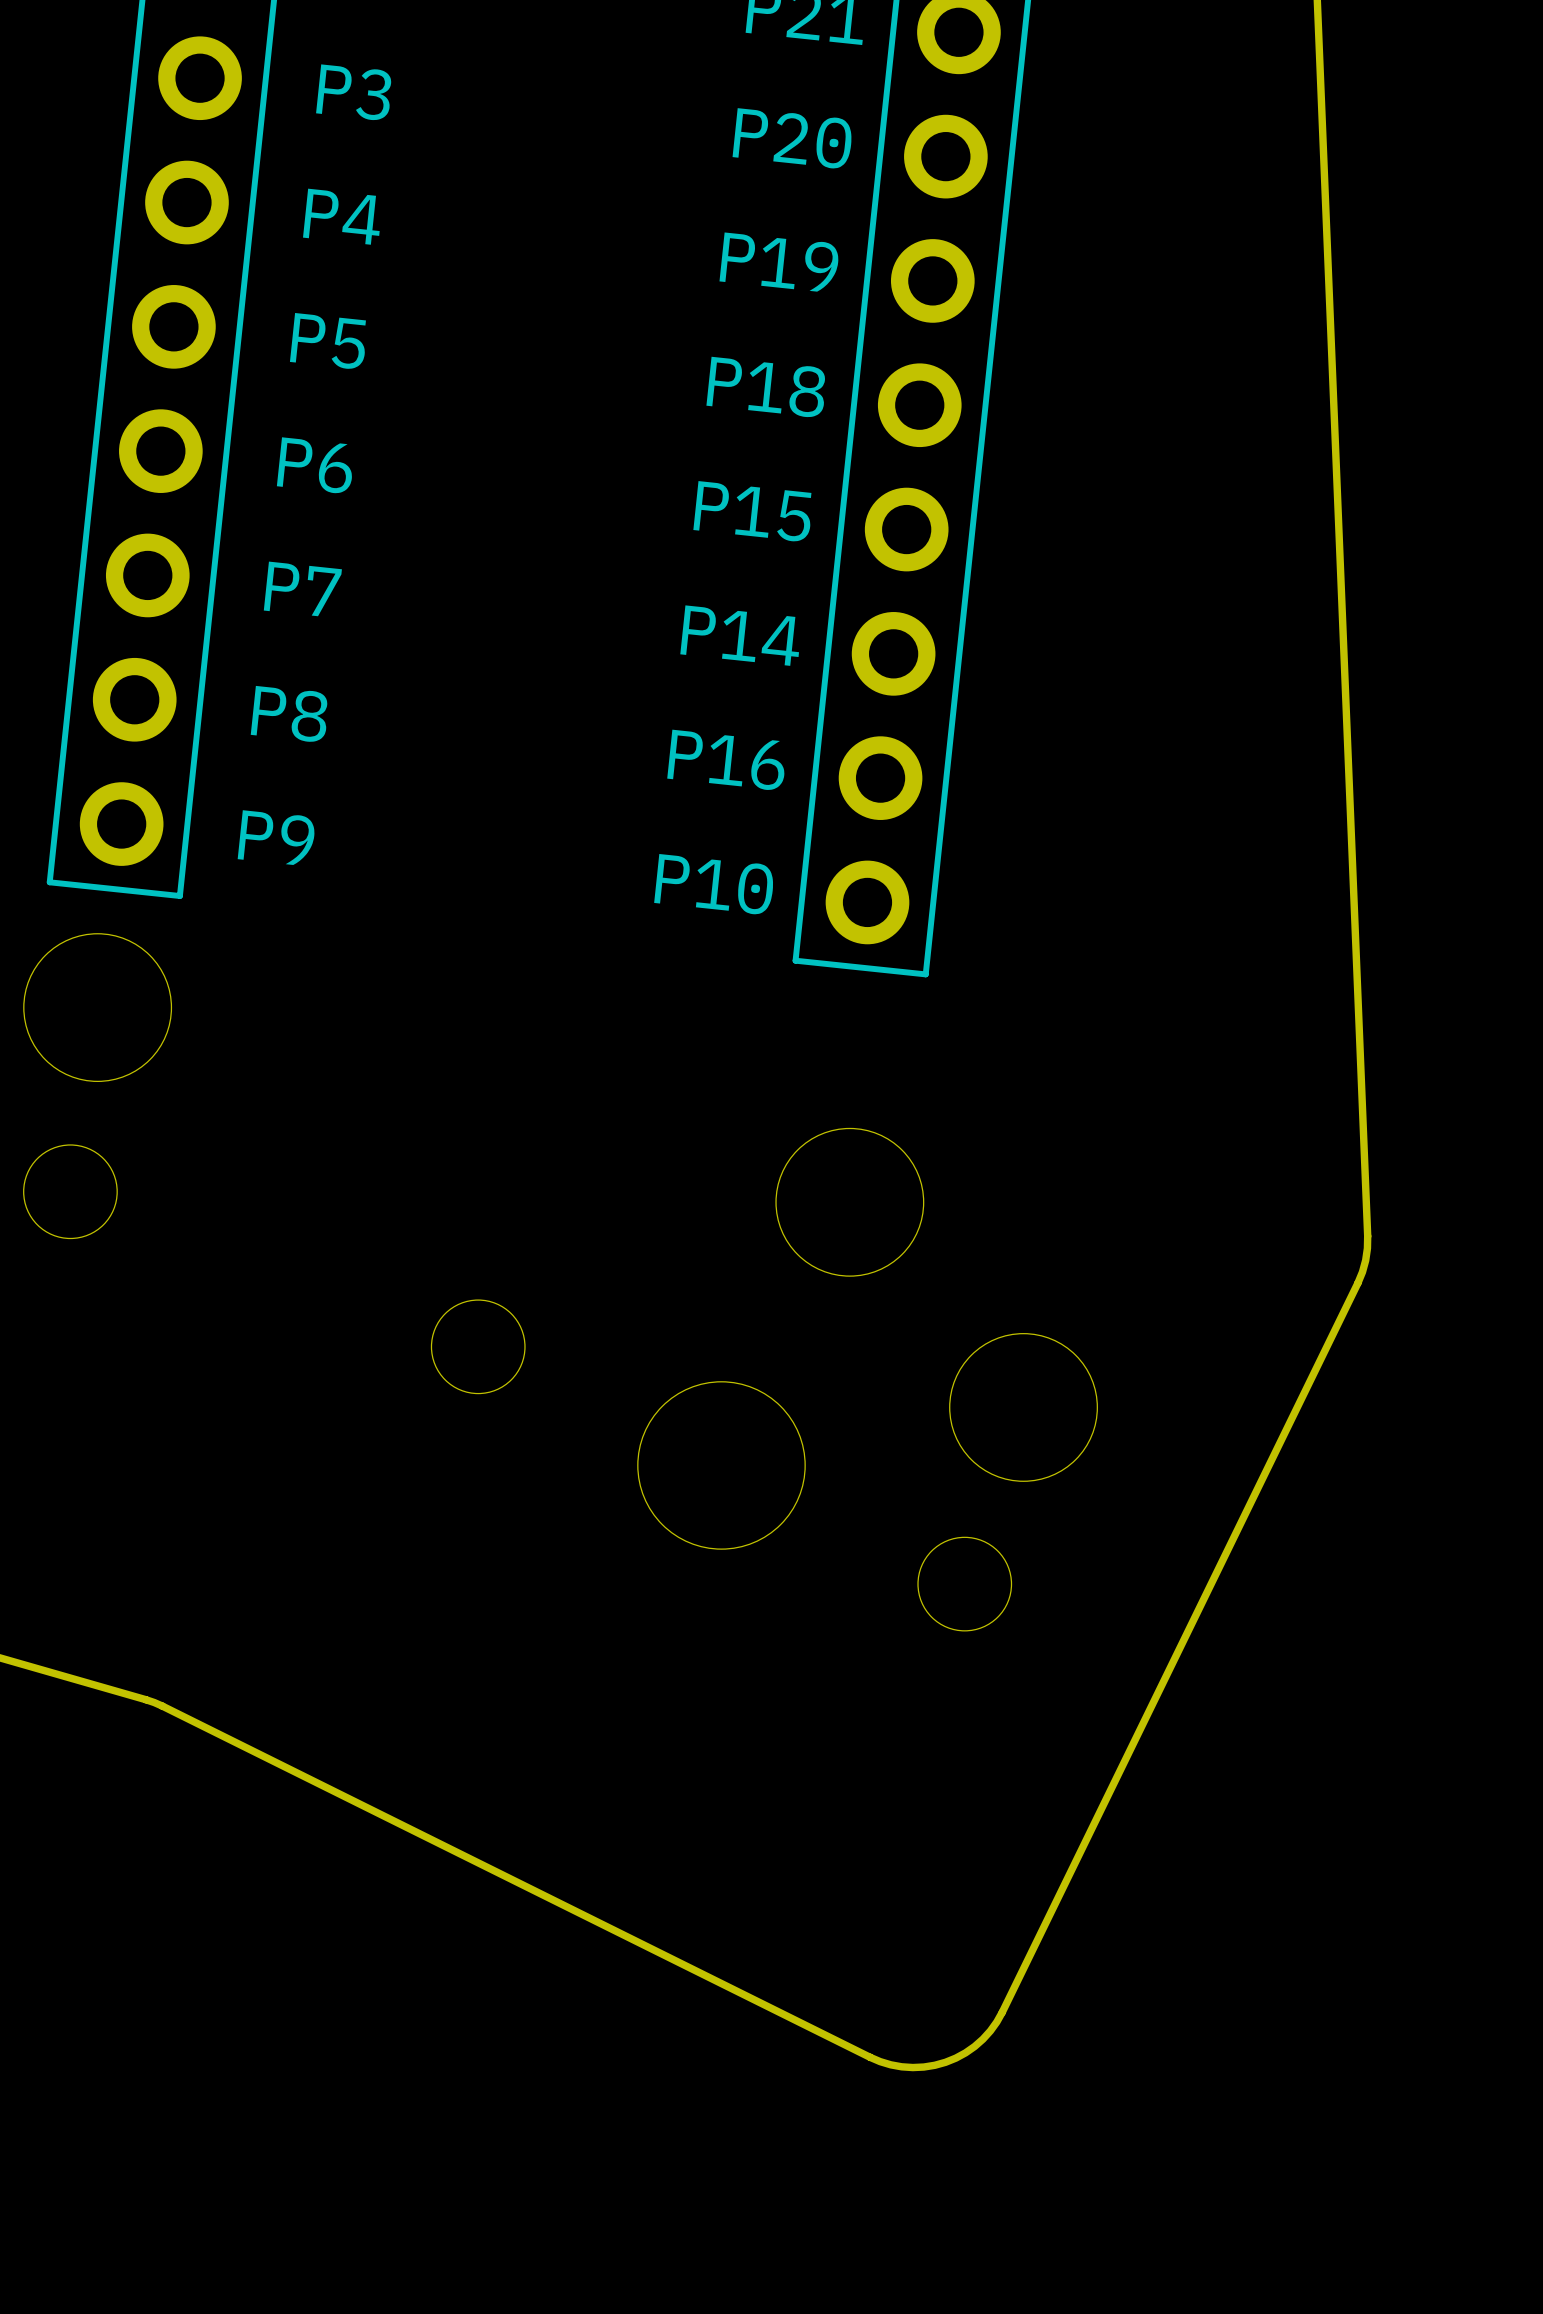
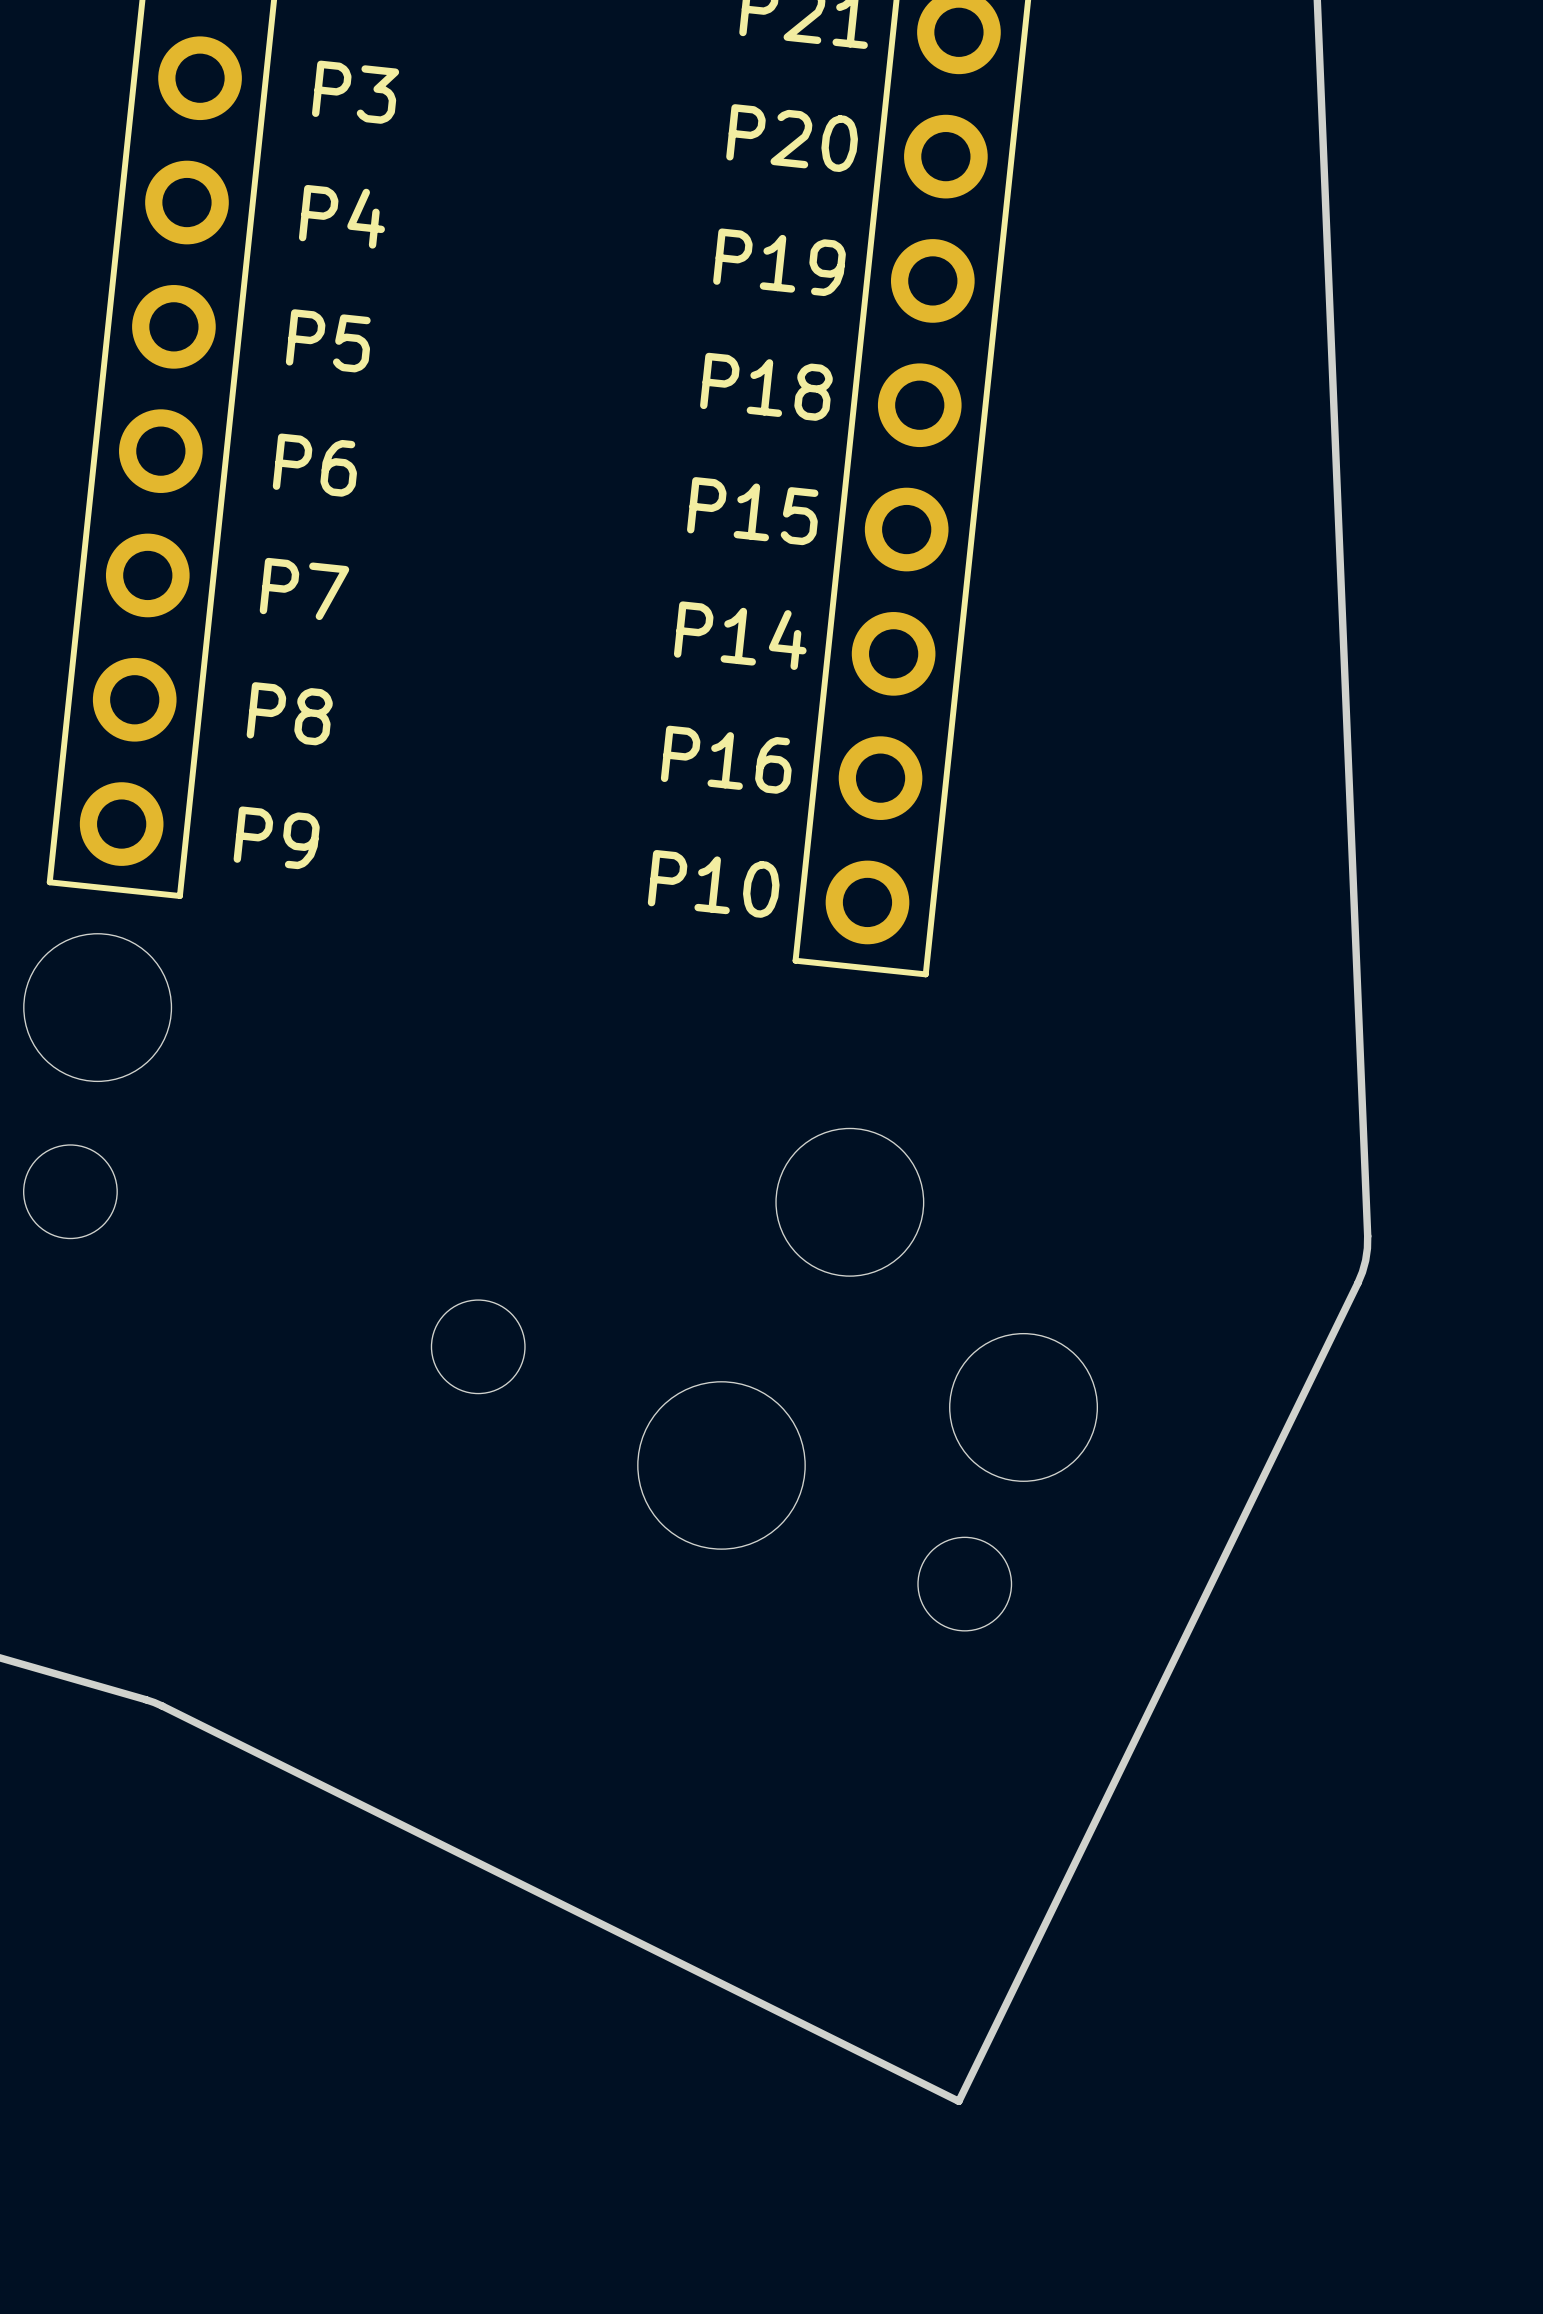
board edge: (1002, 2012) (990, 2030) (974, 2046) (945, 2062) (912, 2067) (890, 2064) (870, 2057) -> (1002, 2012) (958, 2101) (870, 2057)

